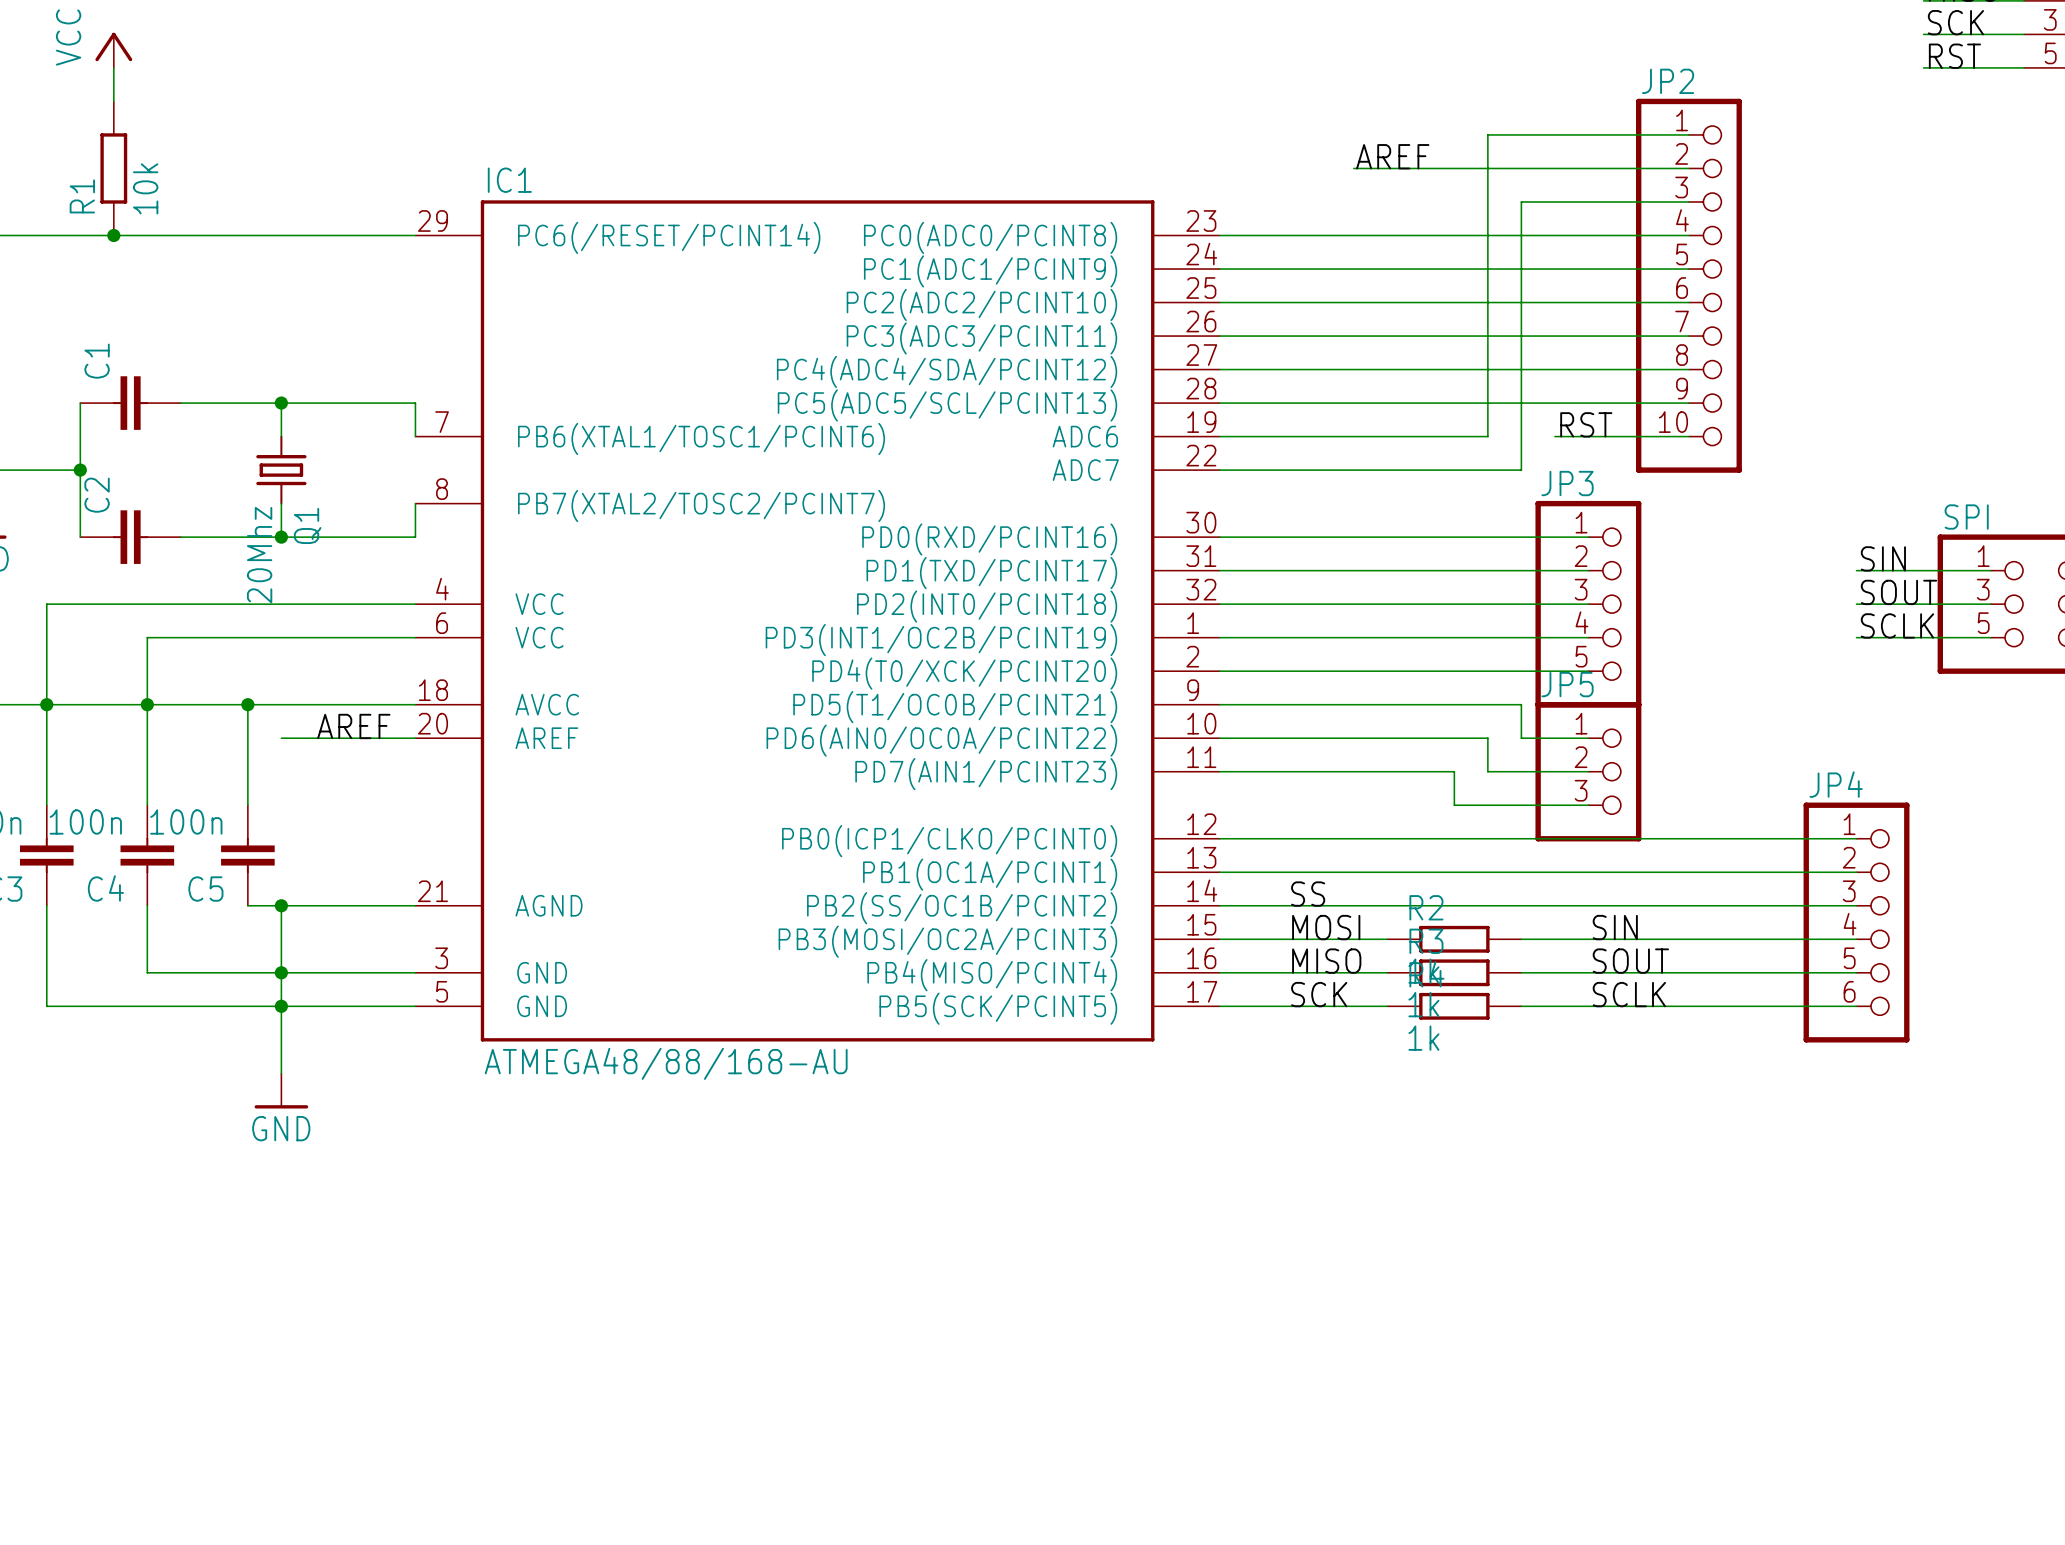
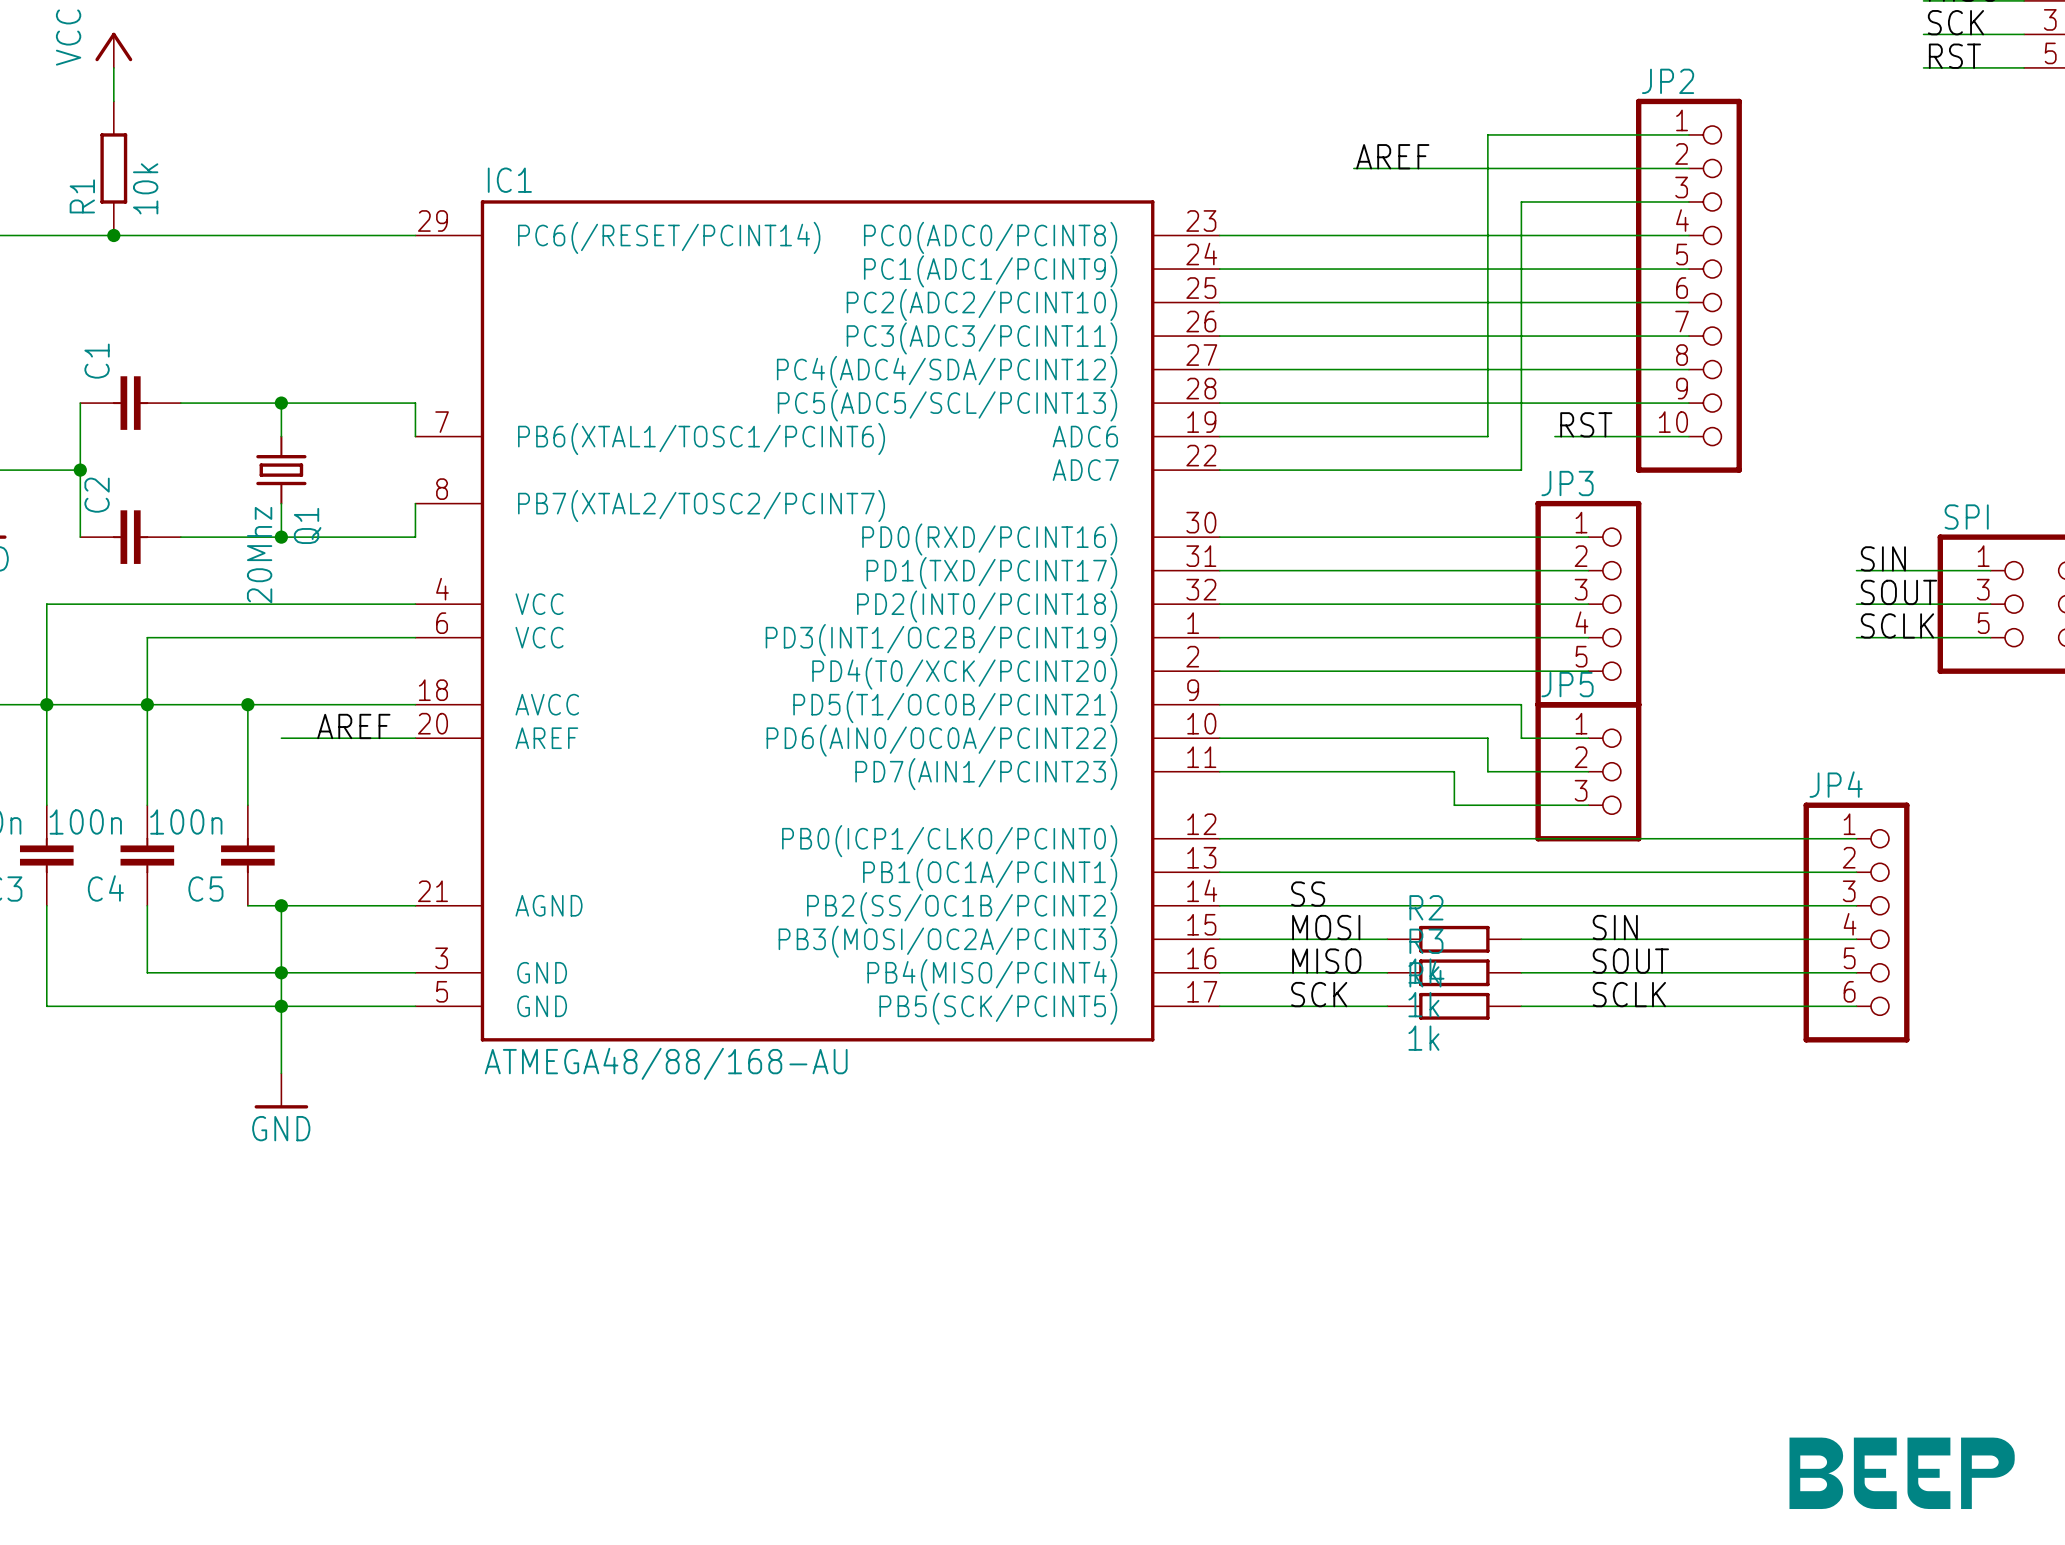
part: none -> (1902, 1473)

